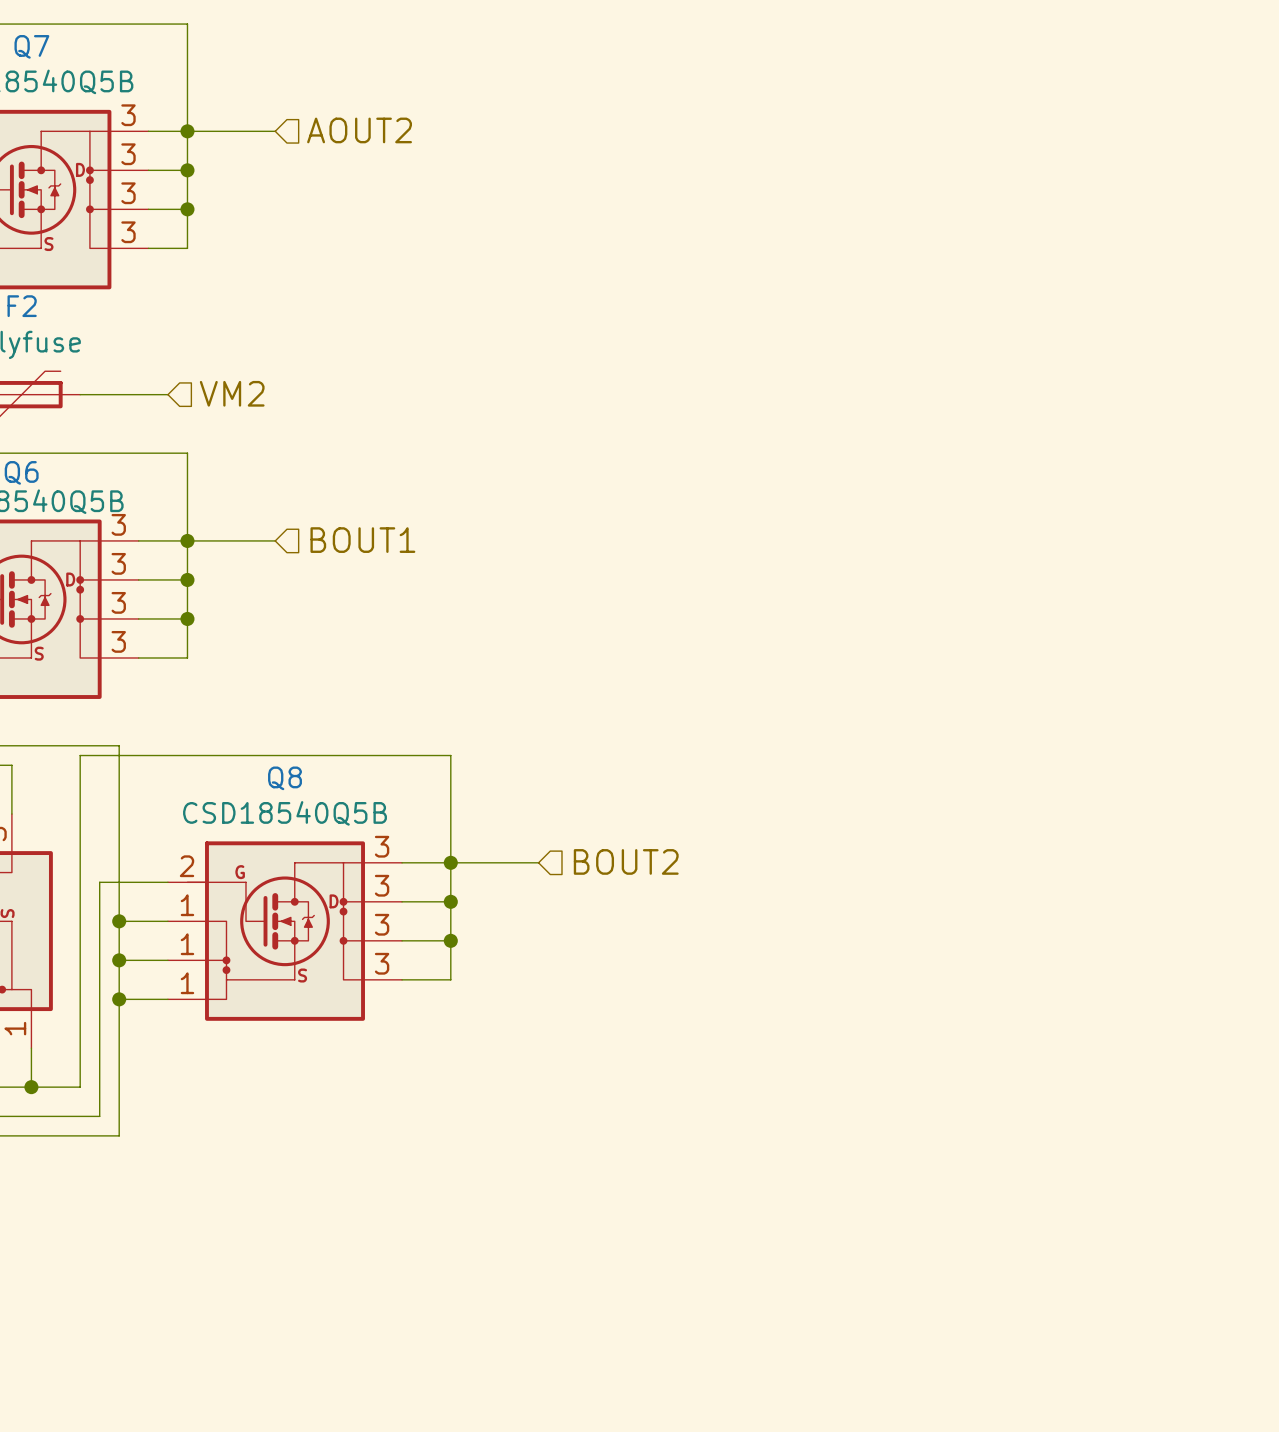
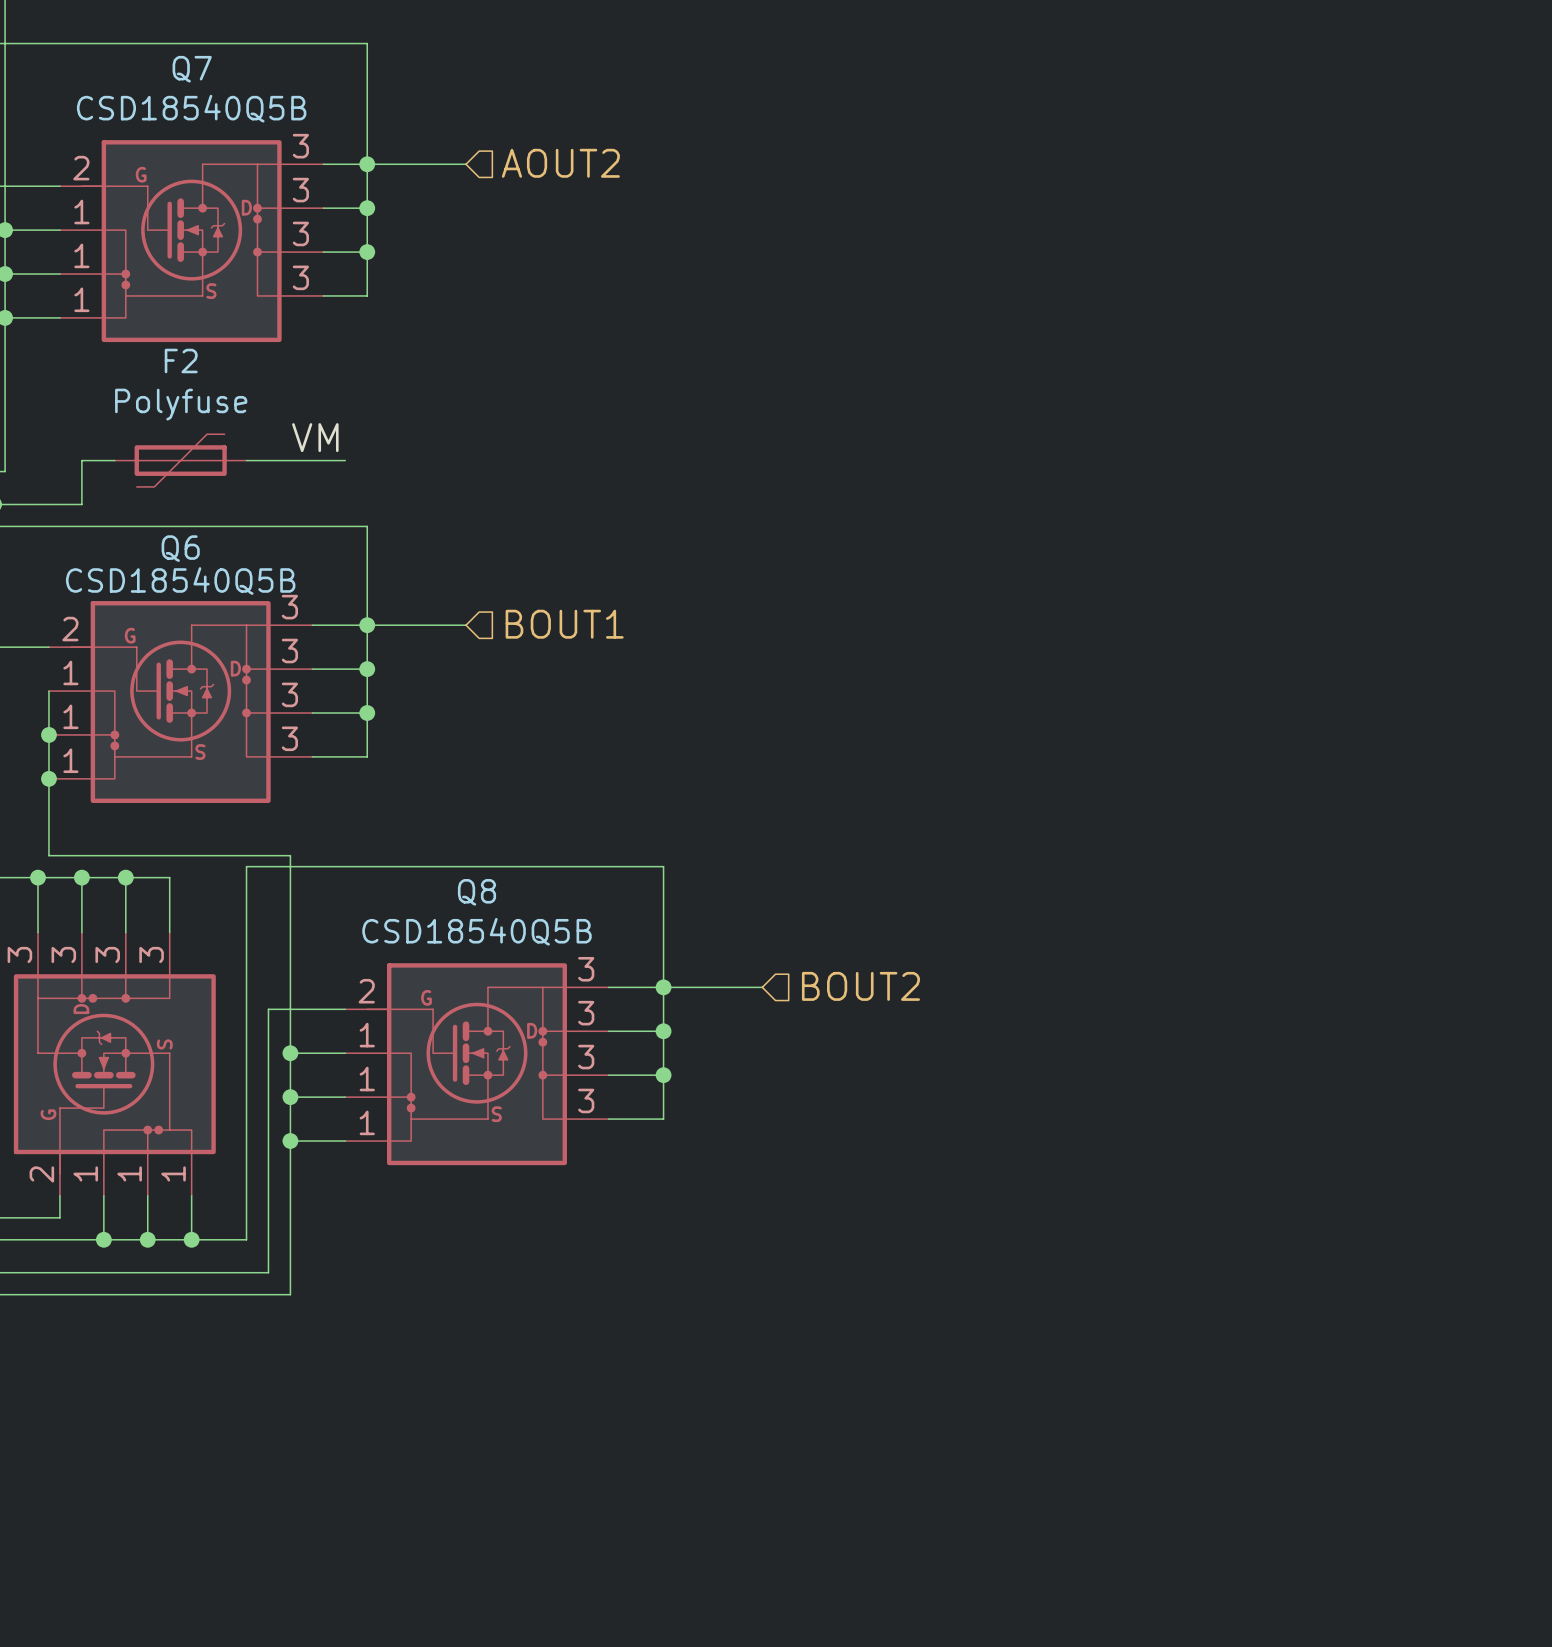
label: none -> VM (315, 437)
hierarchical label: VM2 (232, 393) -> none

